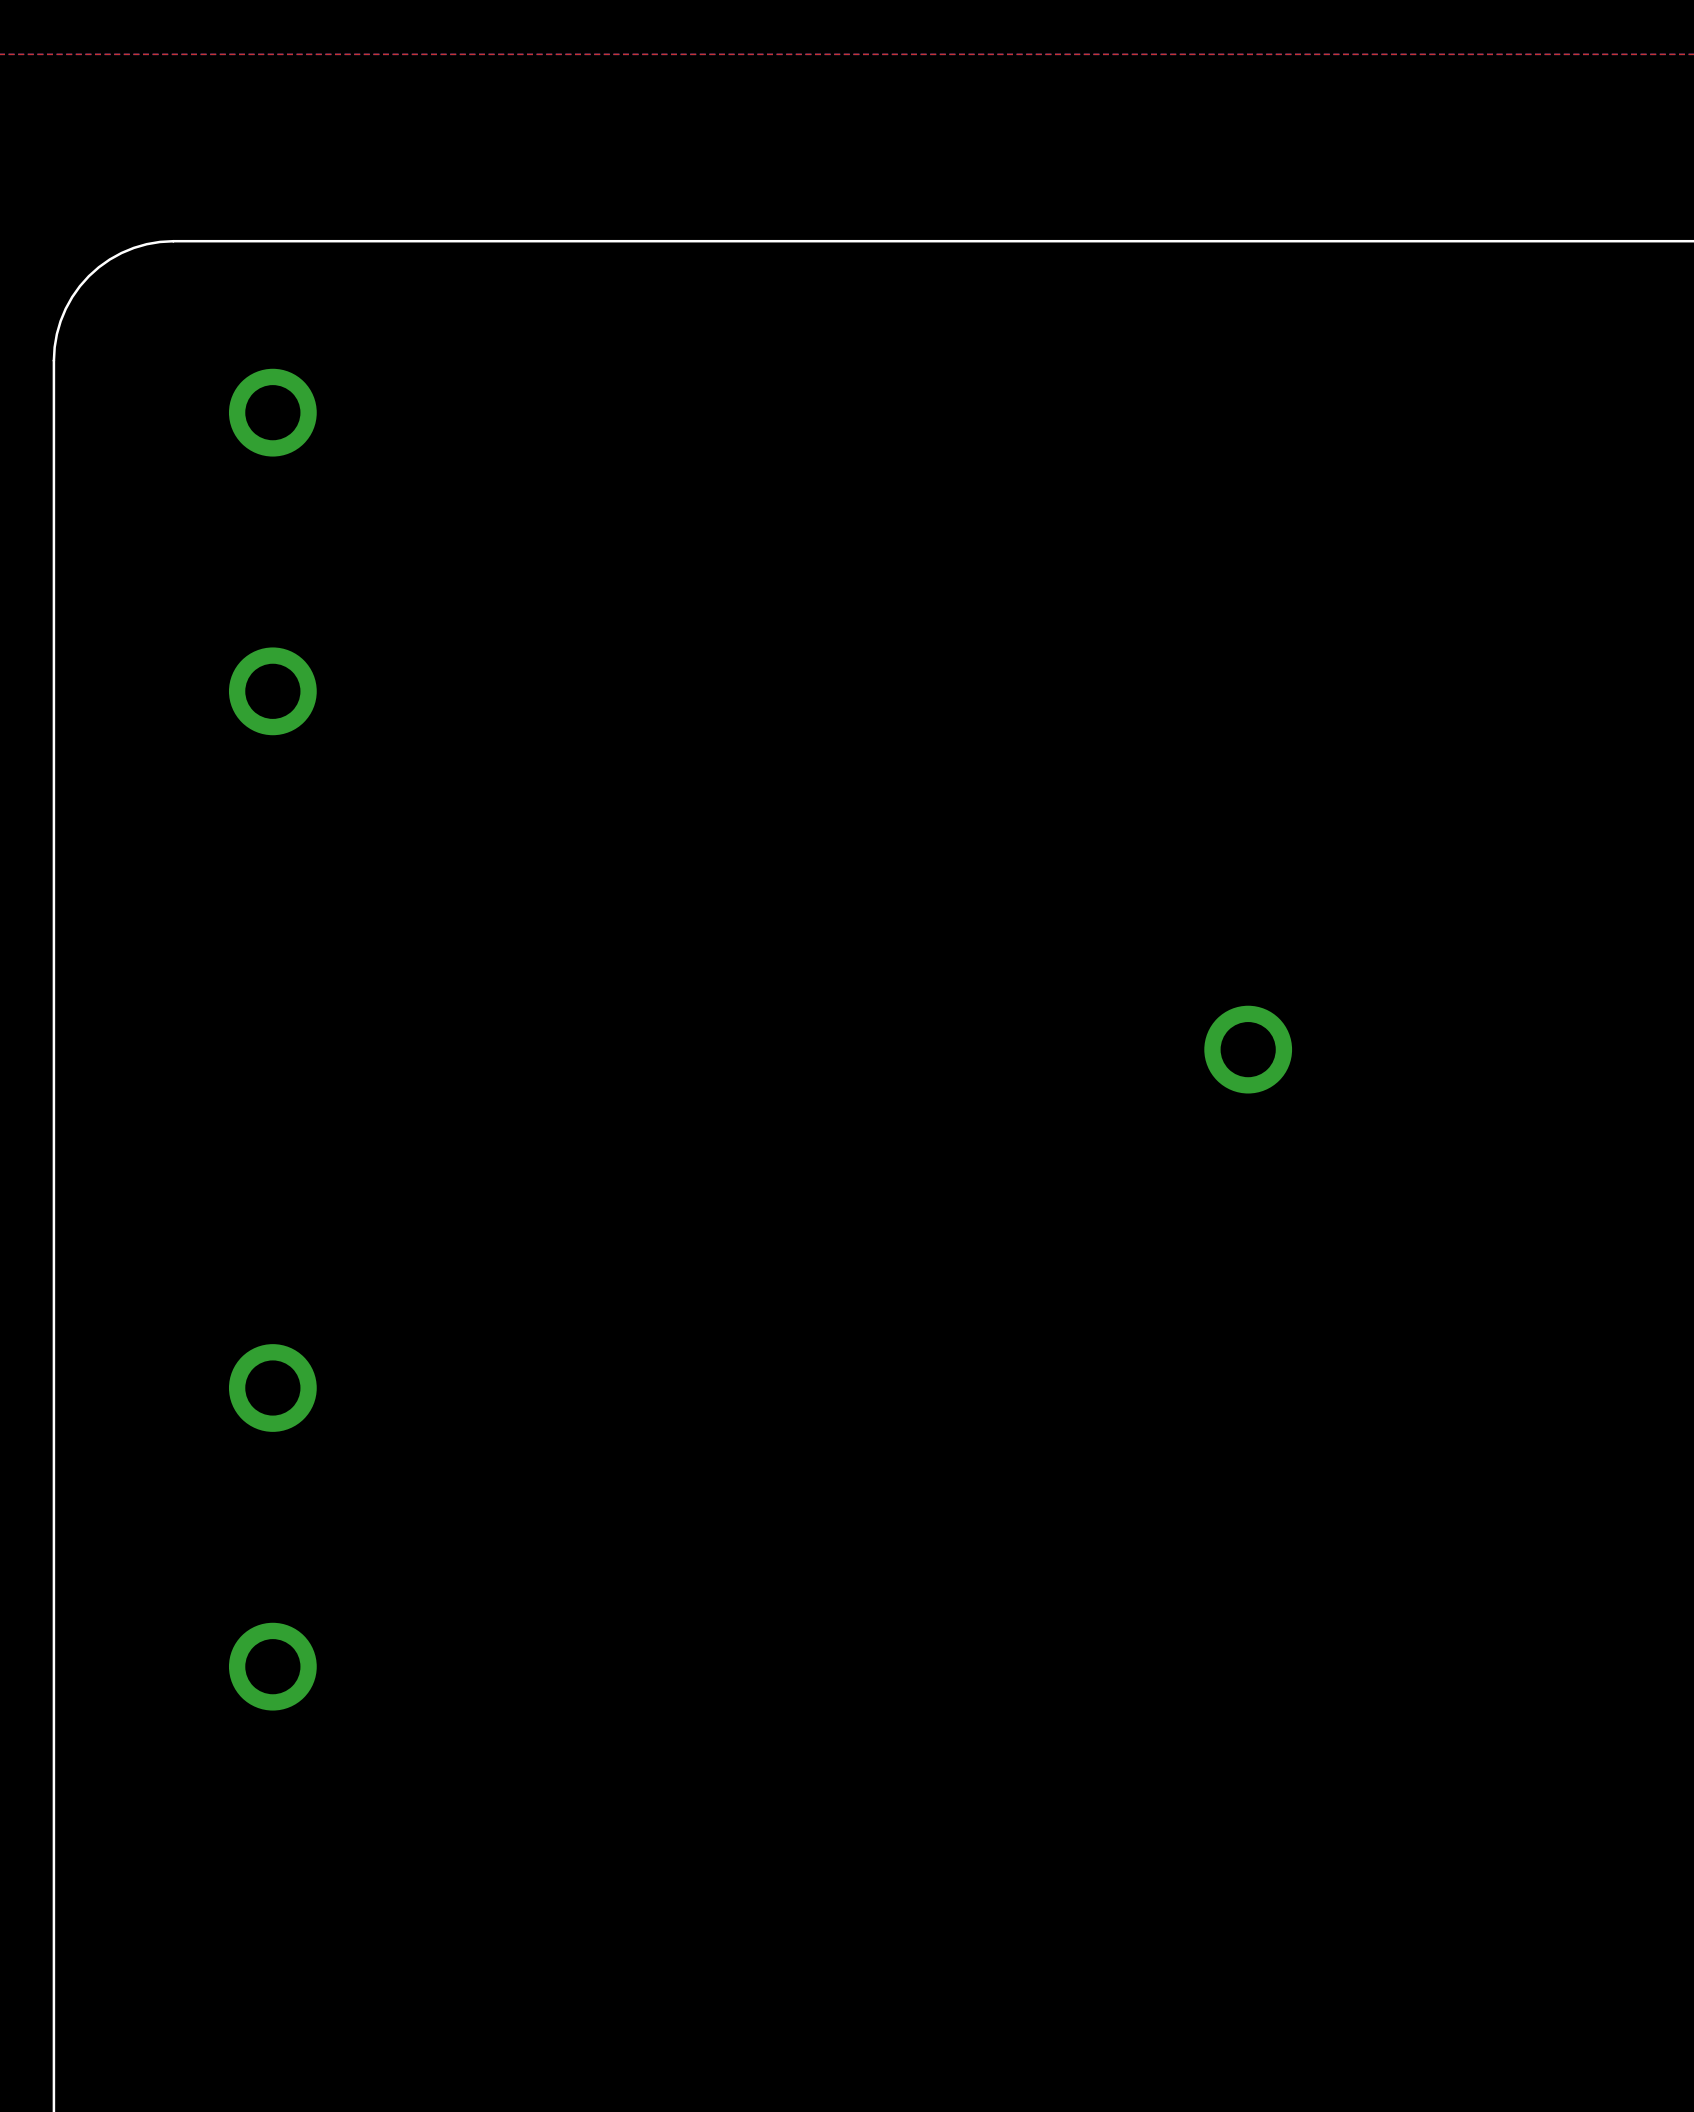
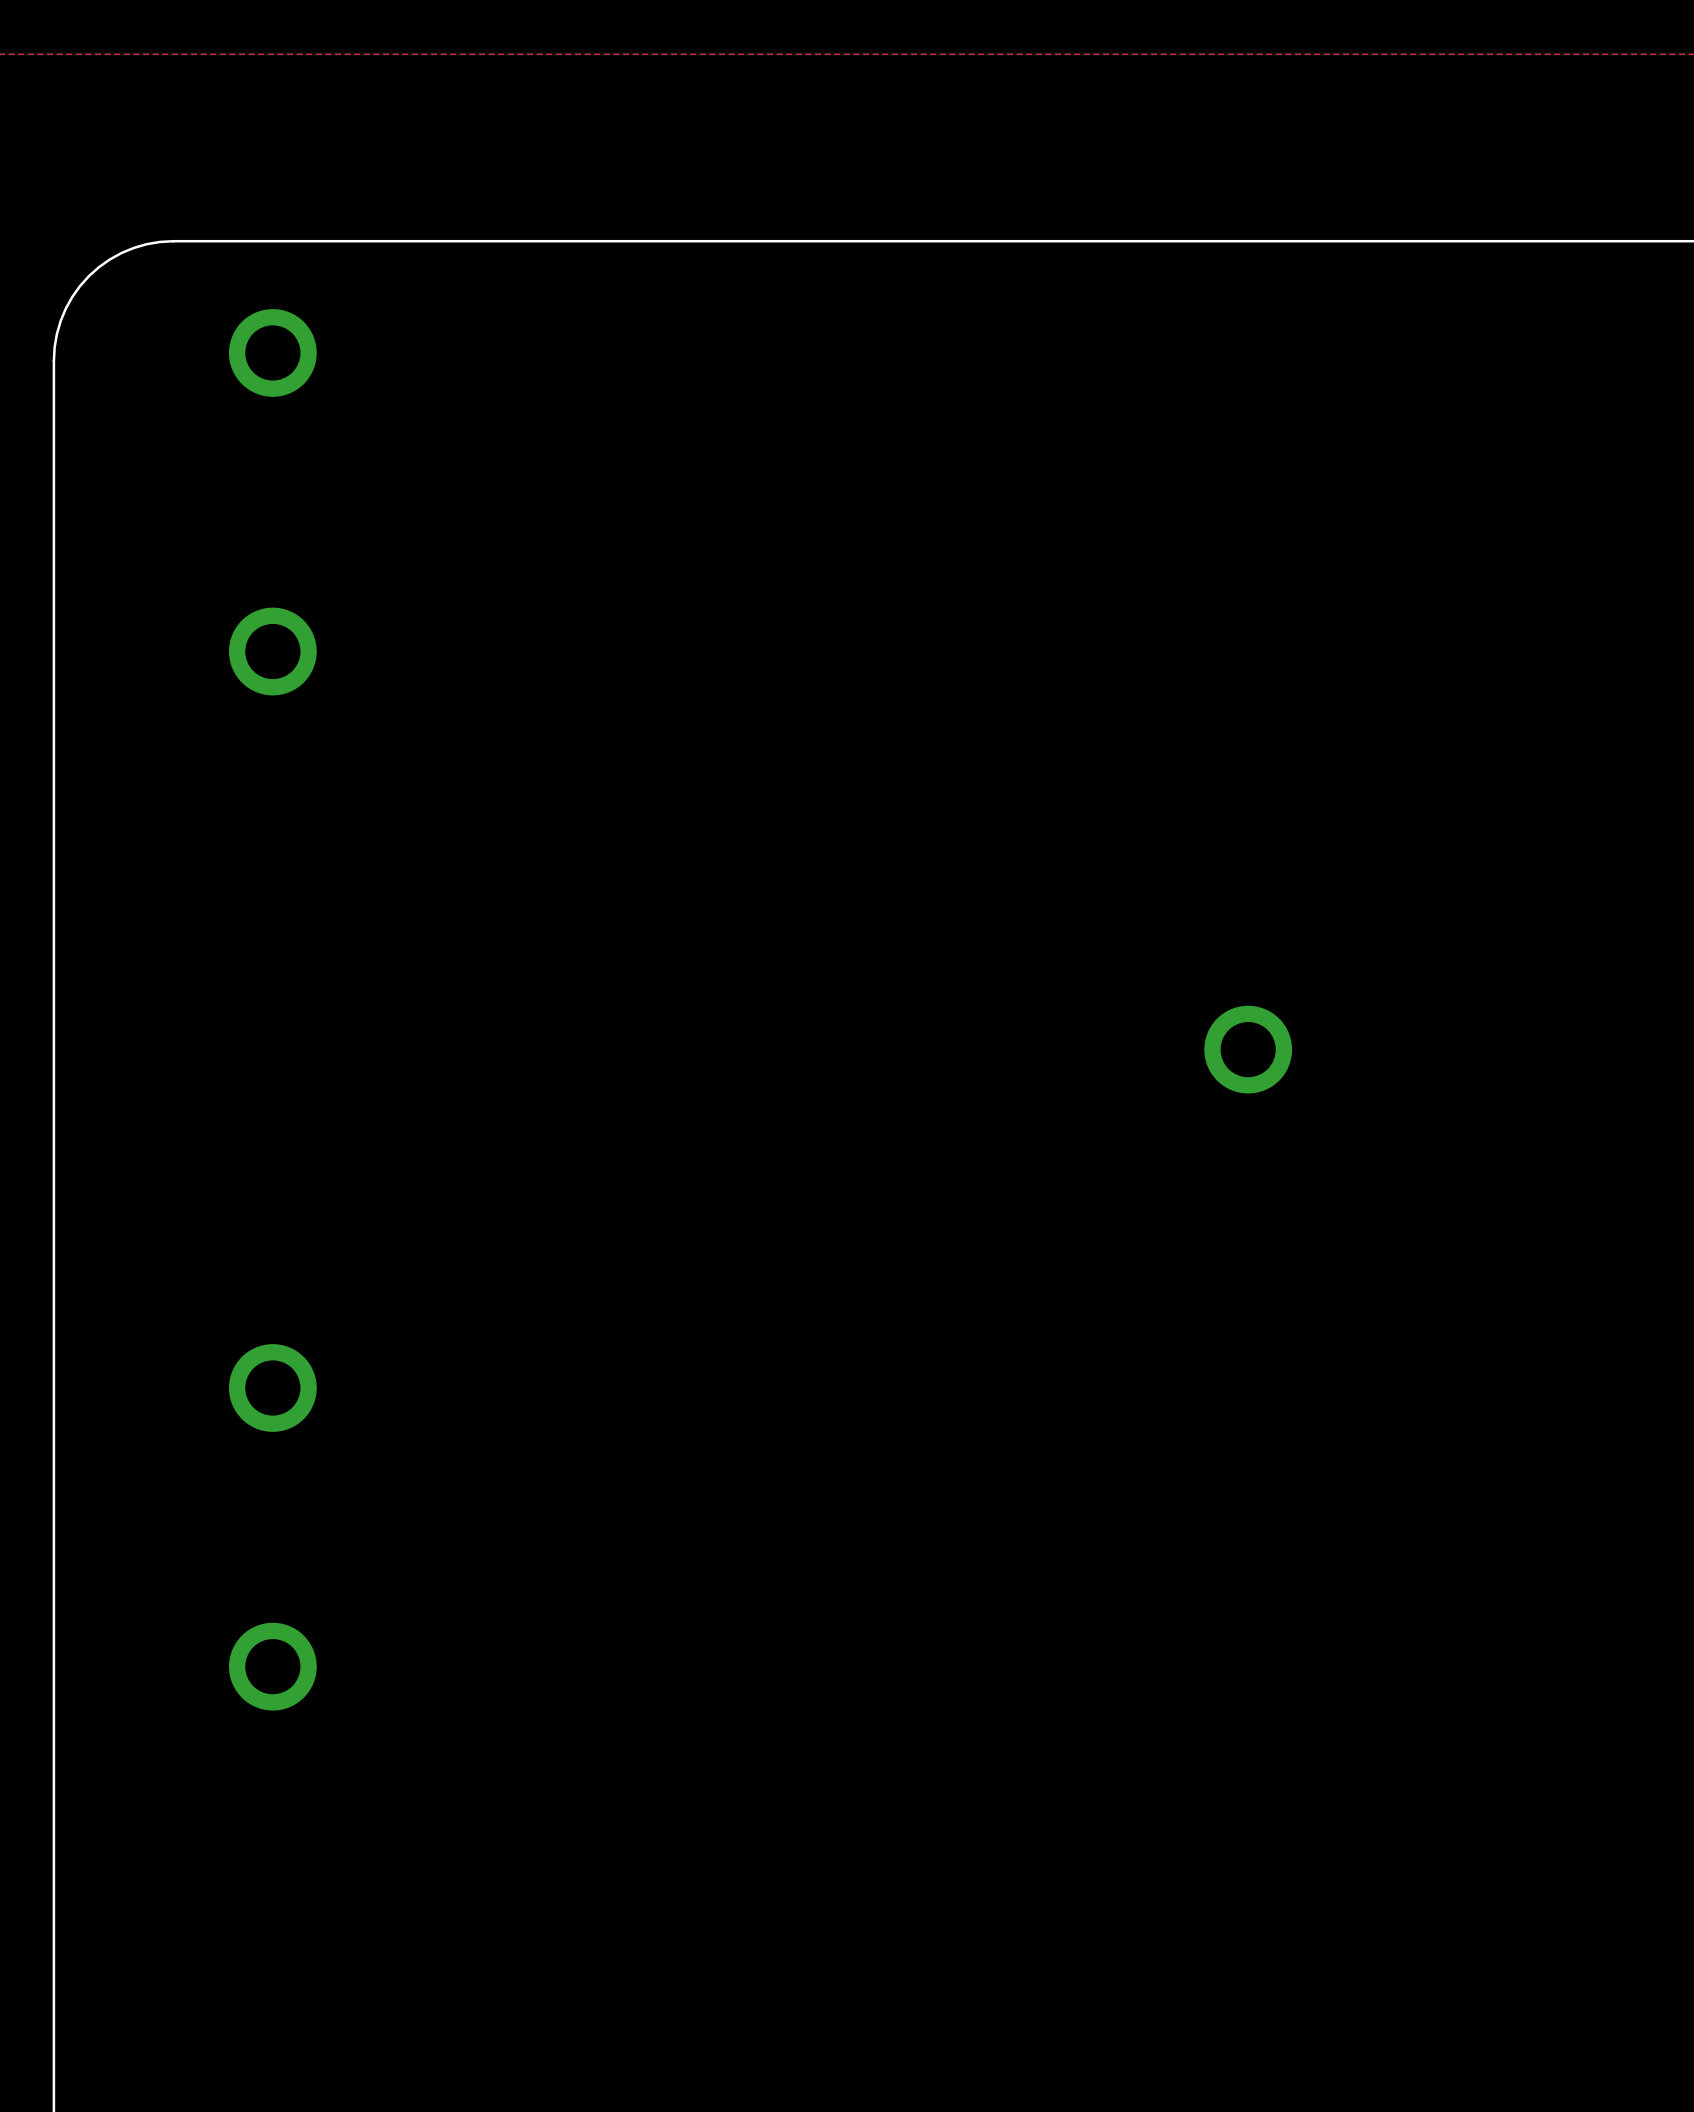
part position: (272, 412) -> (272, 352)
part position: (272, 691) -> (272, 651)

